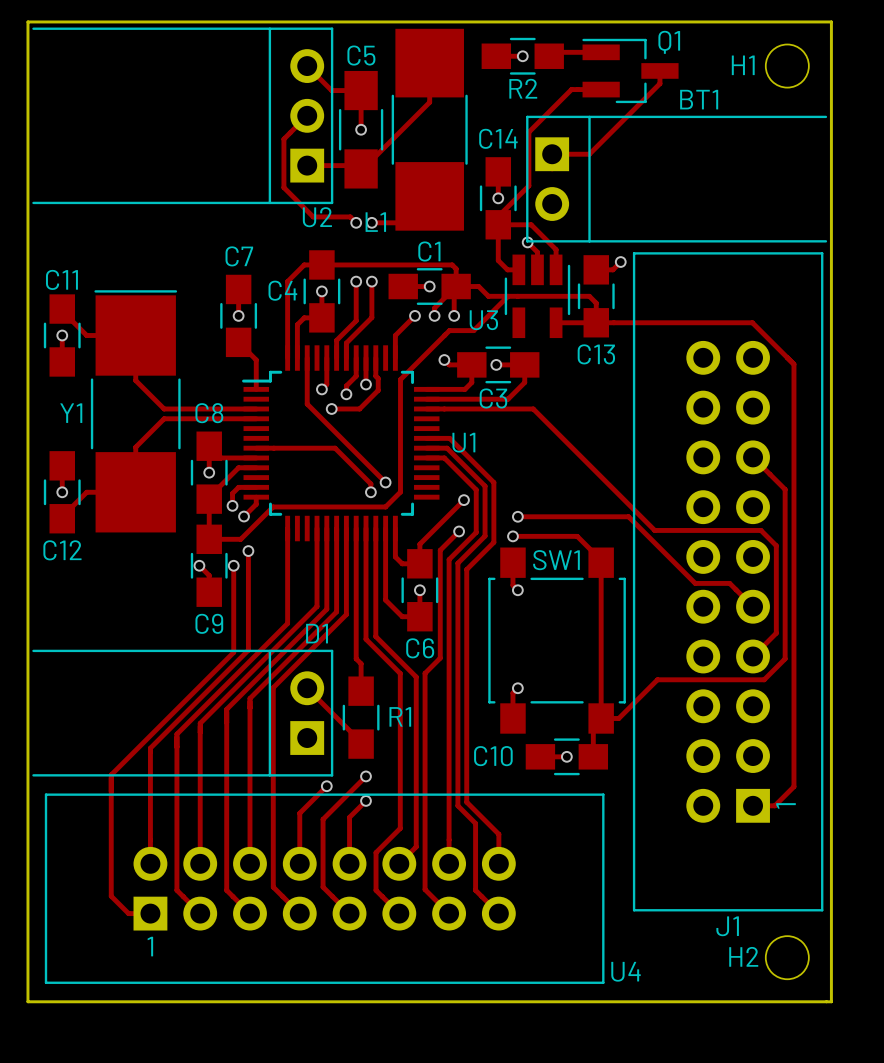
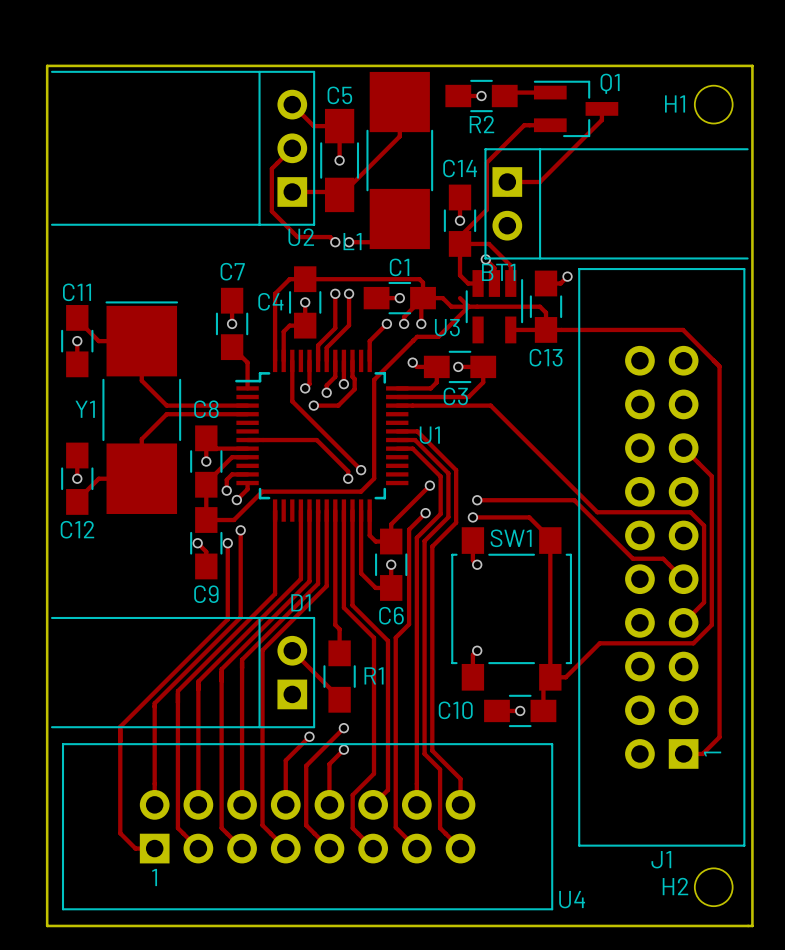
BT1 name position: BT1 (699, 99) -> BT1 (498, 272)
track: none -> (460, 298) (468, 306)

